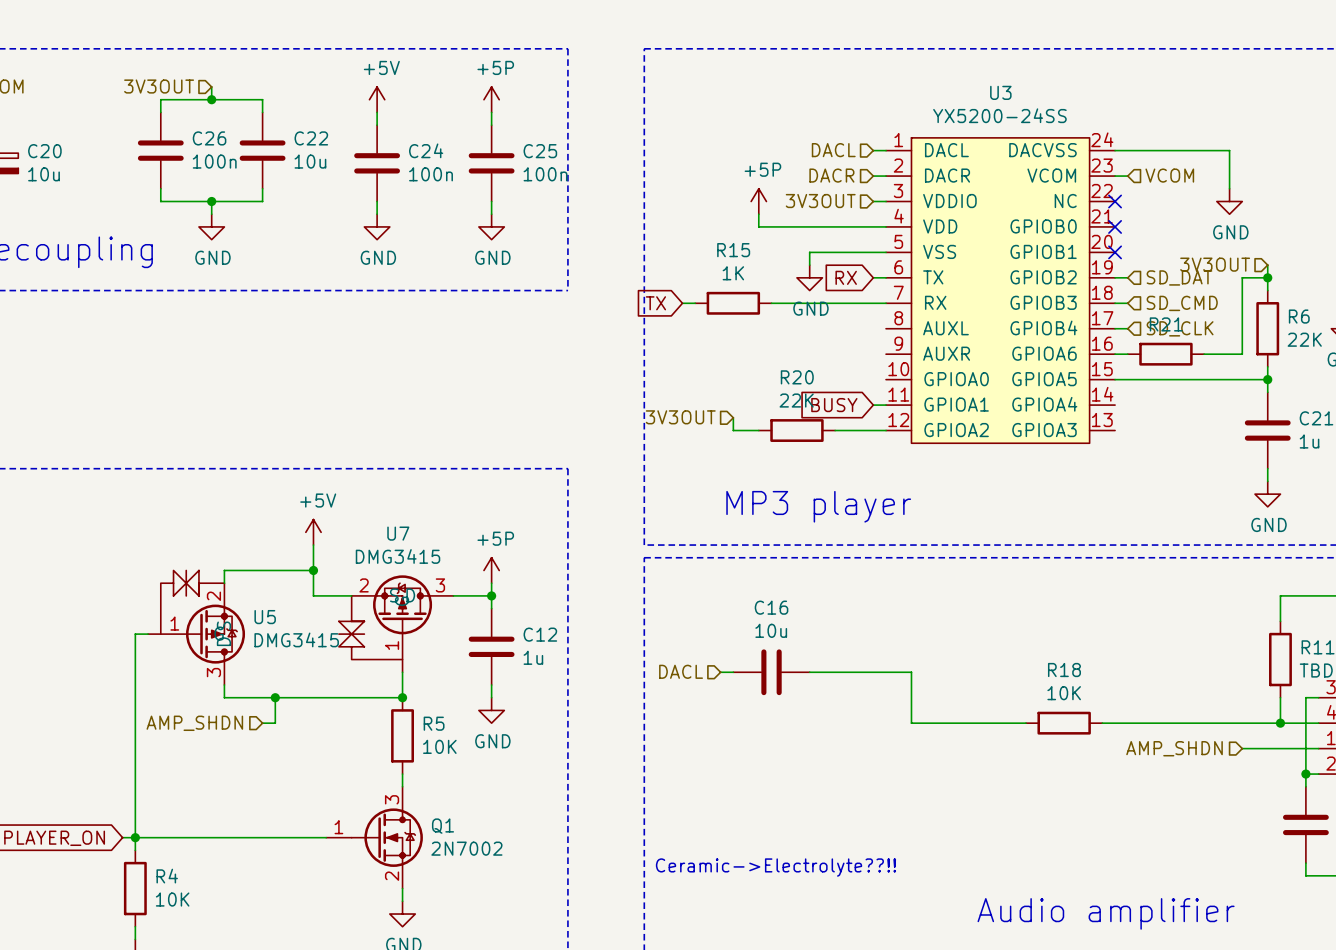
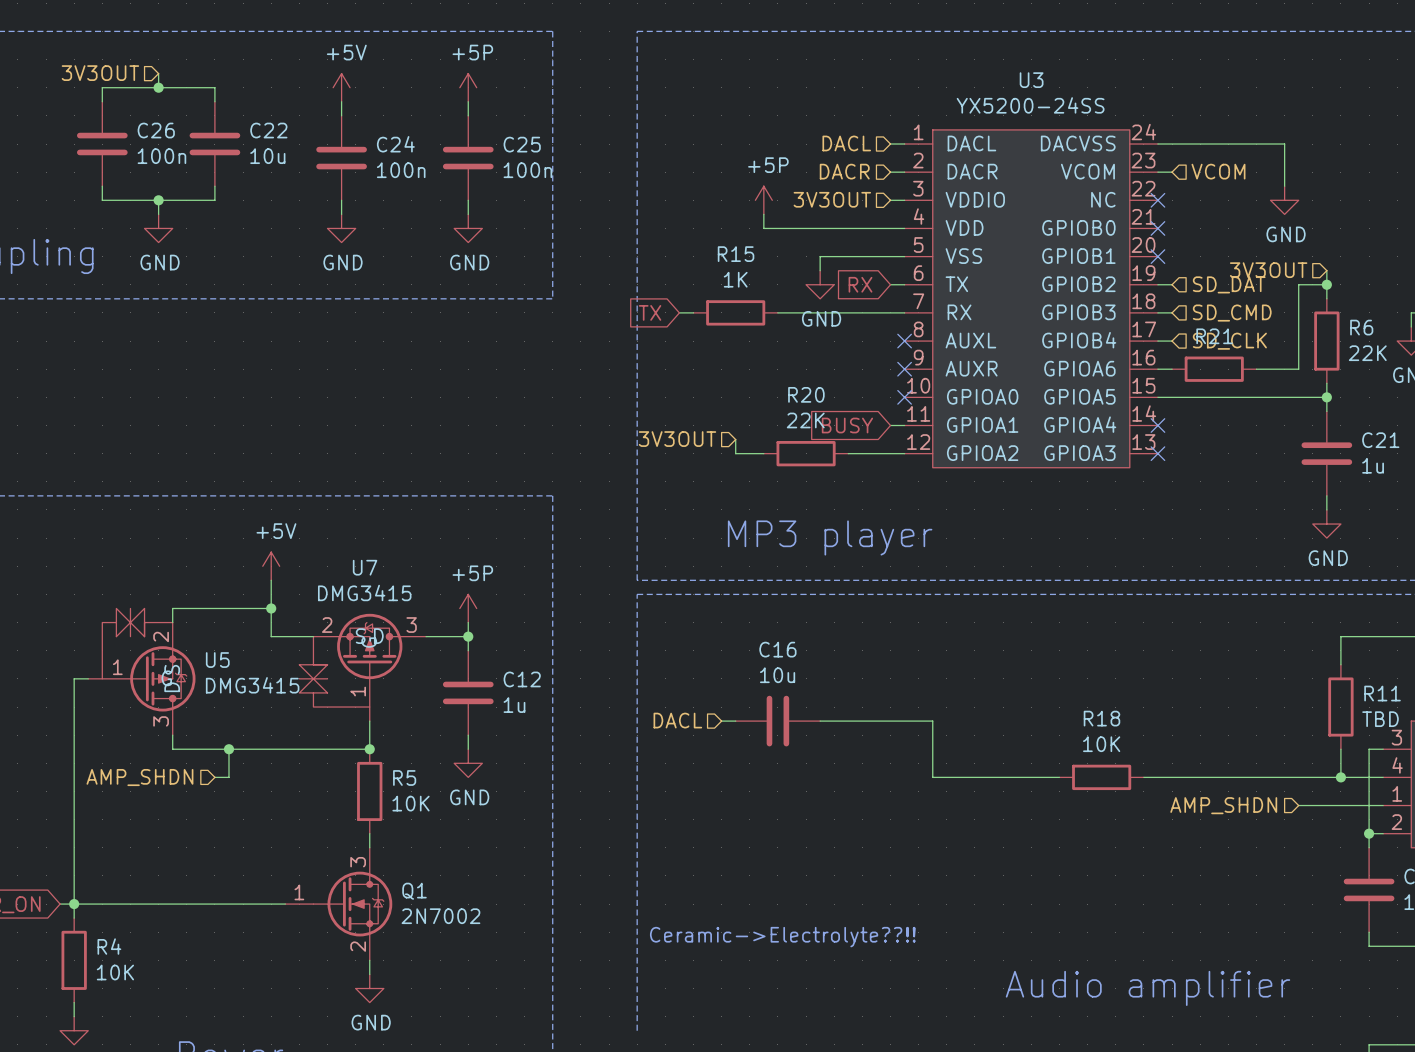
no-connect mark: none -> (904, 341)
no-connect mark: none -> (904, 369)
no-connect mark: none -> (904, 397)
no-connect mark: none -> (1157, 425)
no-connect mark: none -> (1157, 453)

